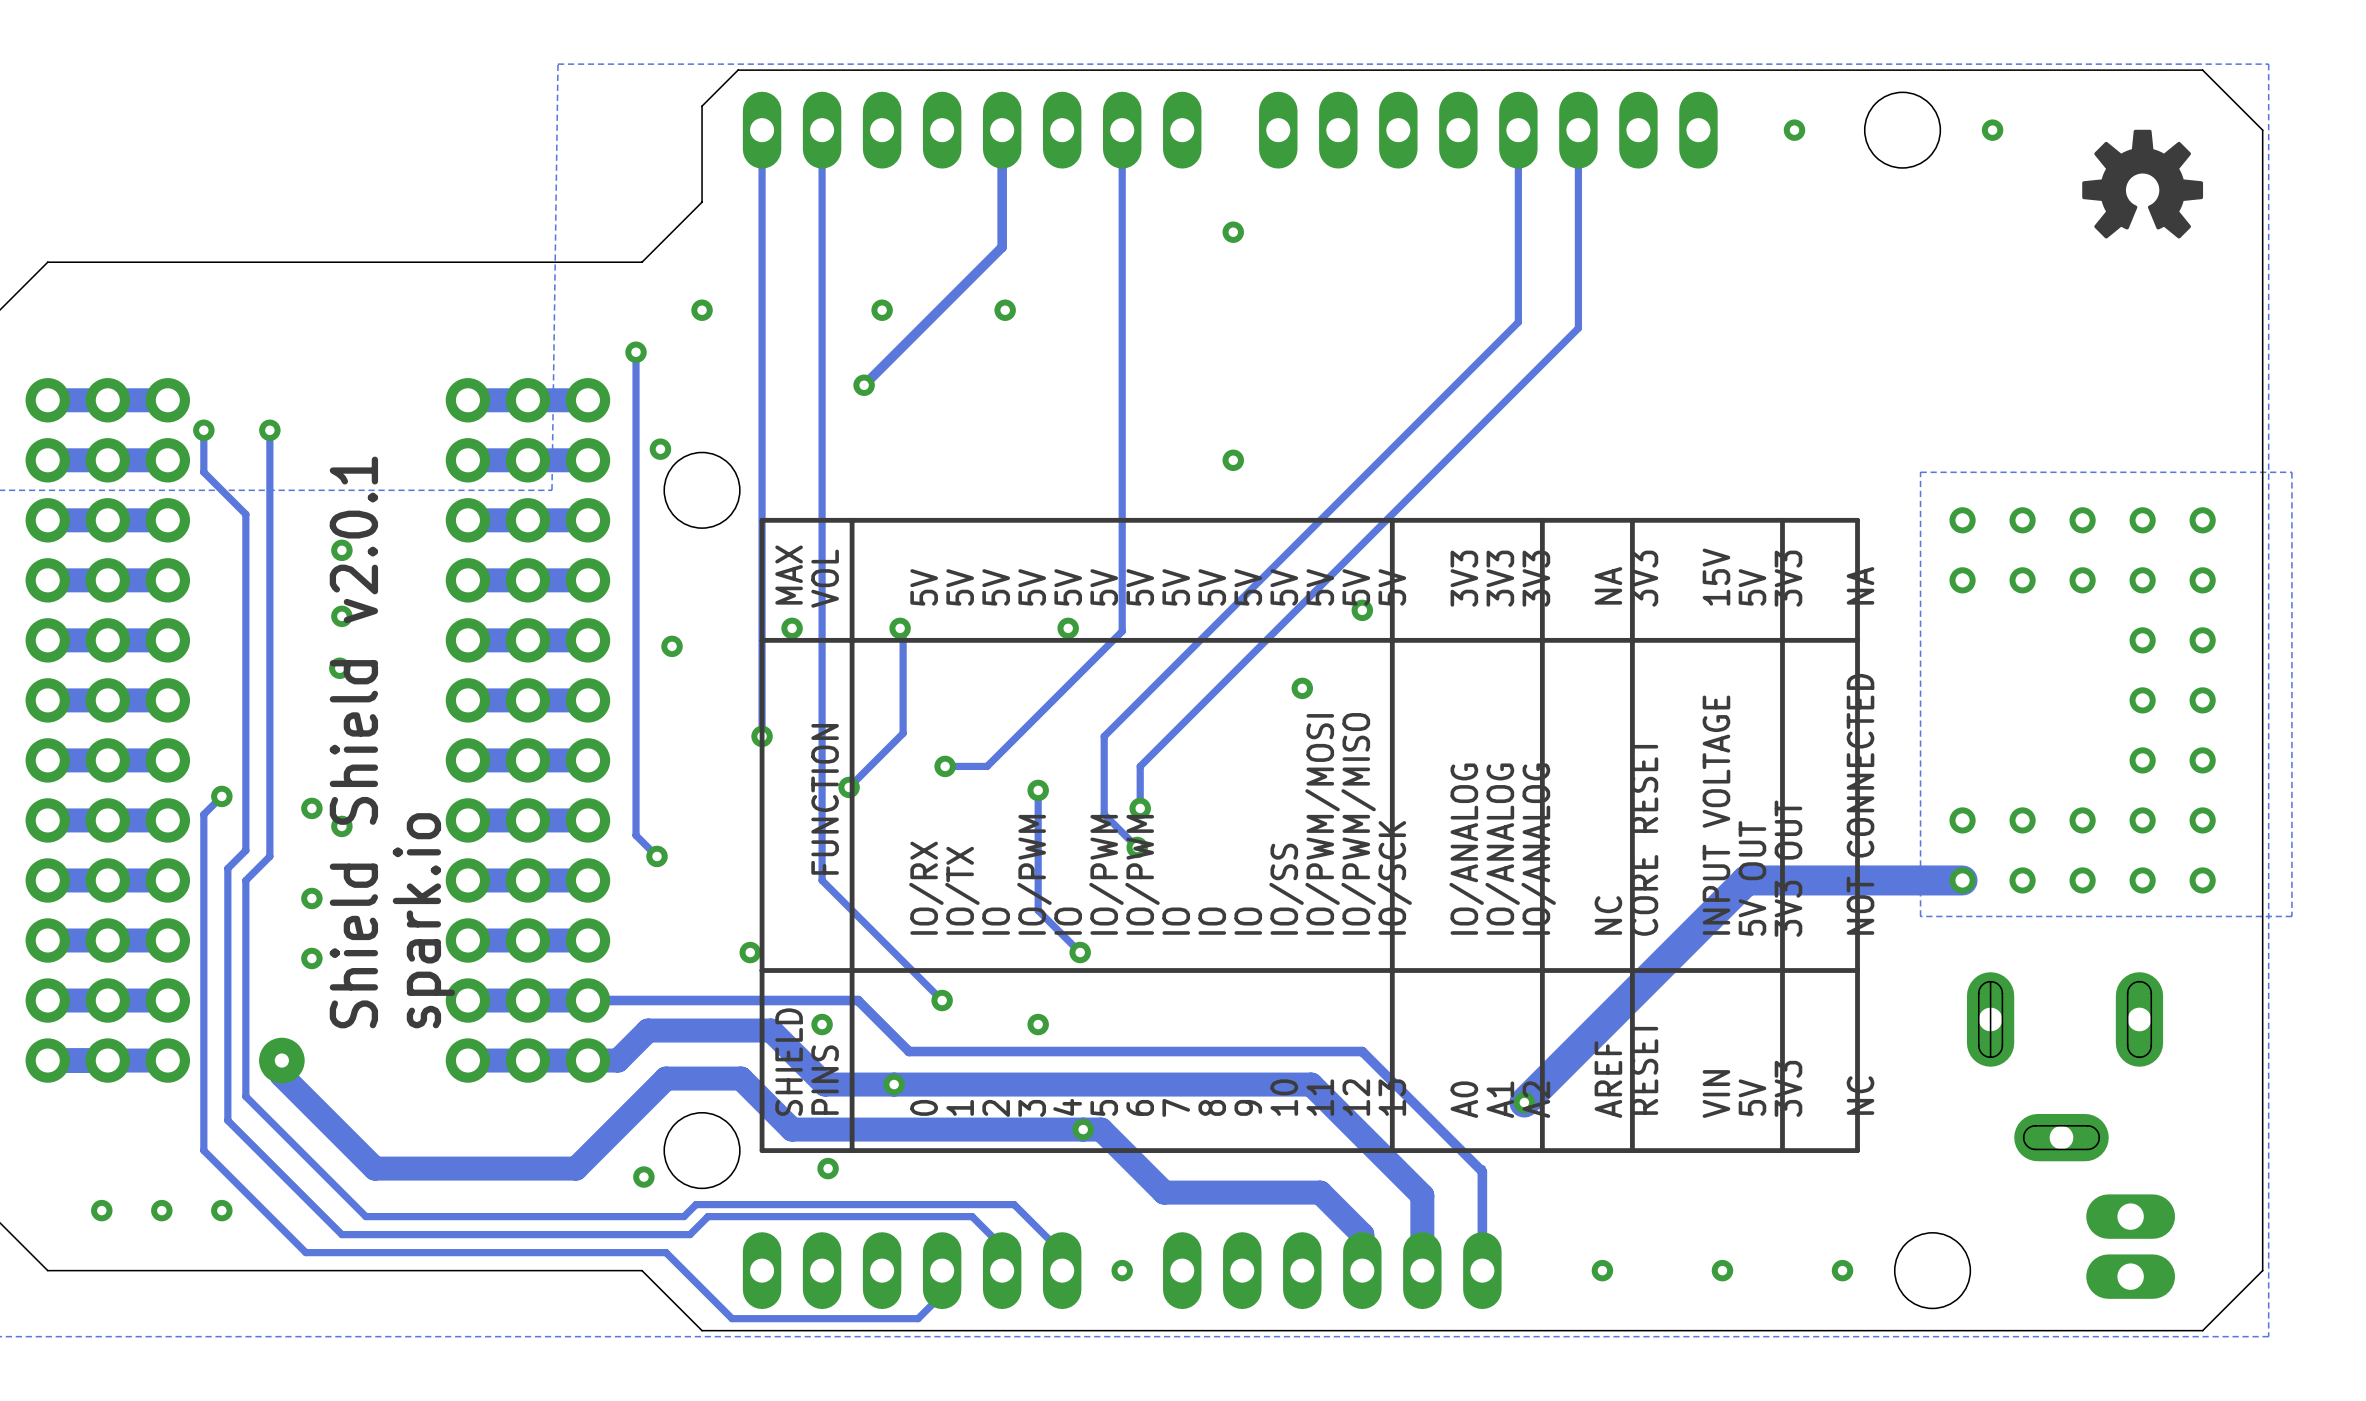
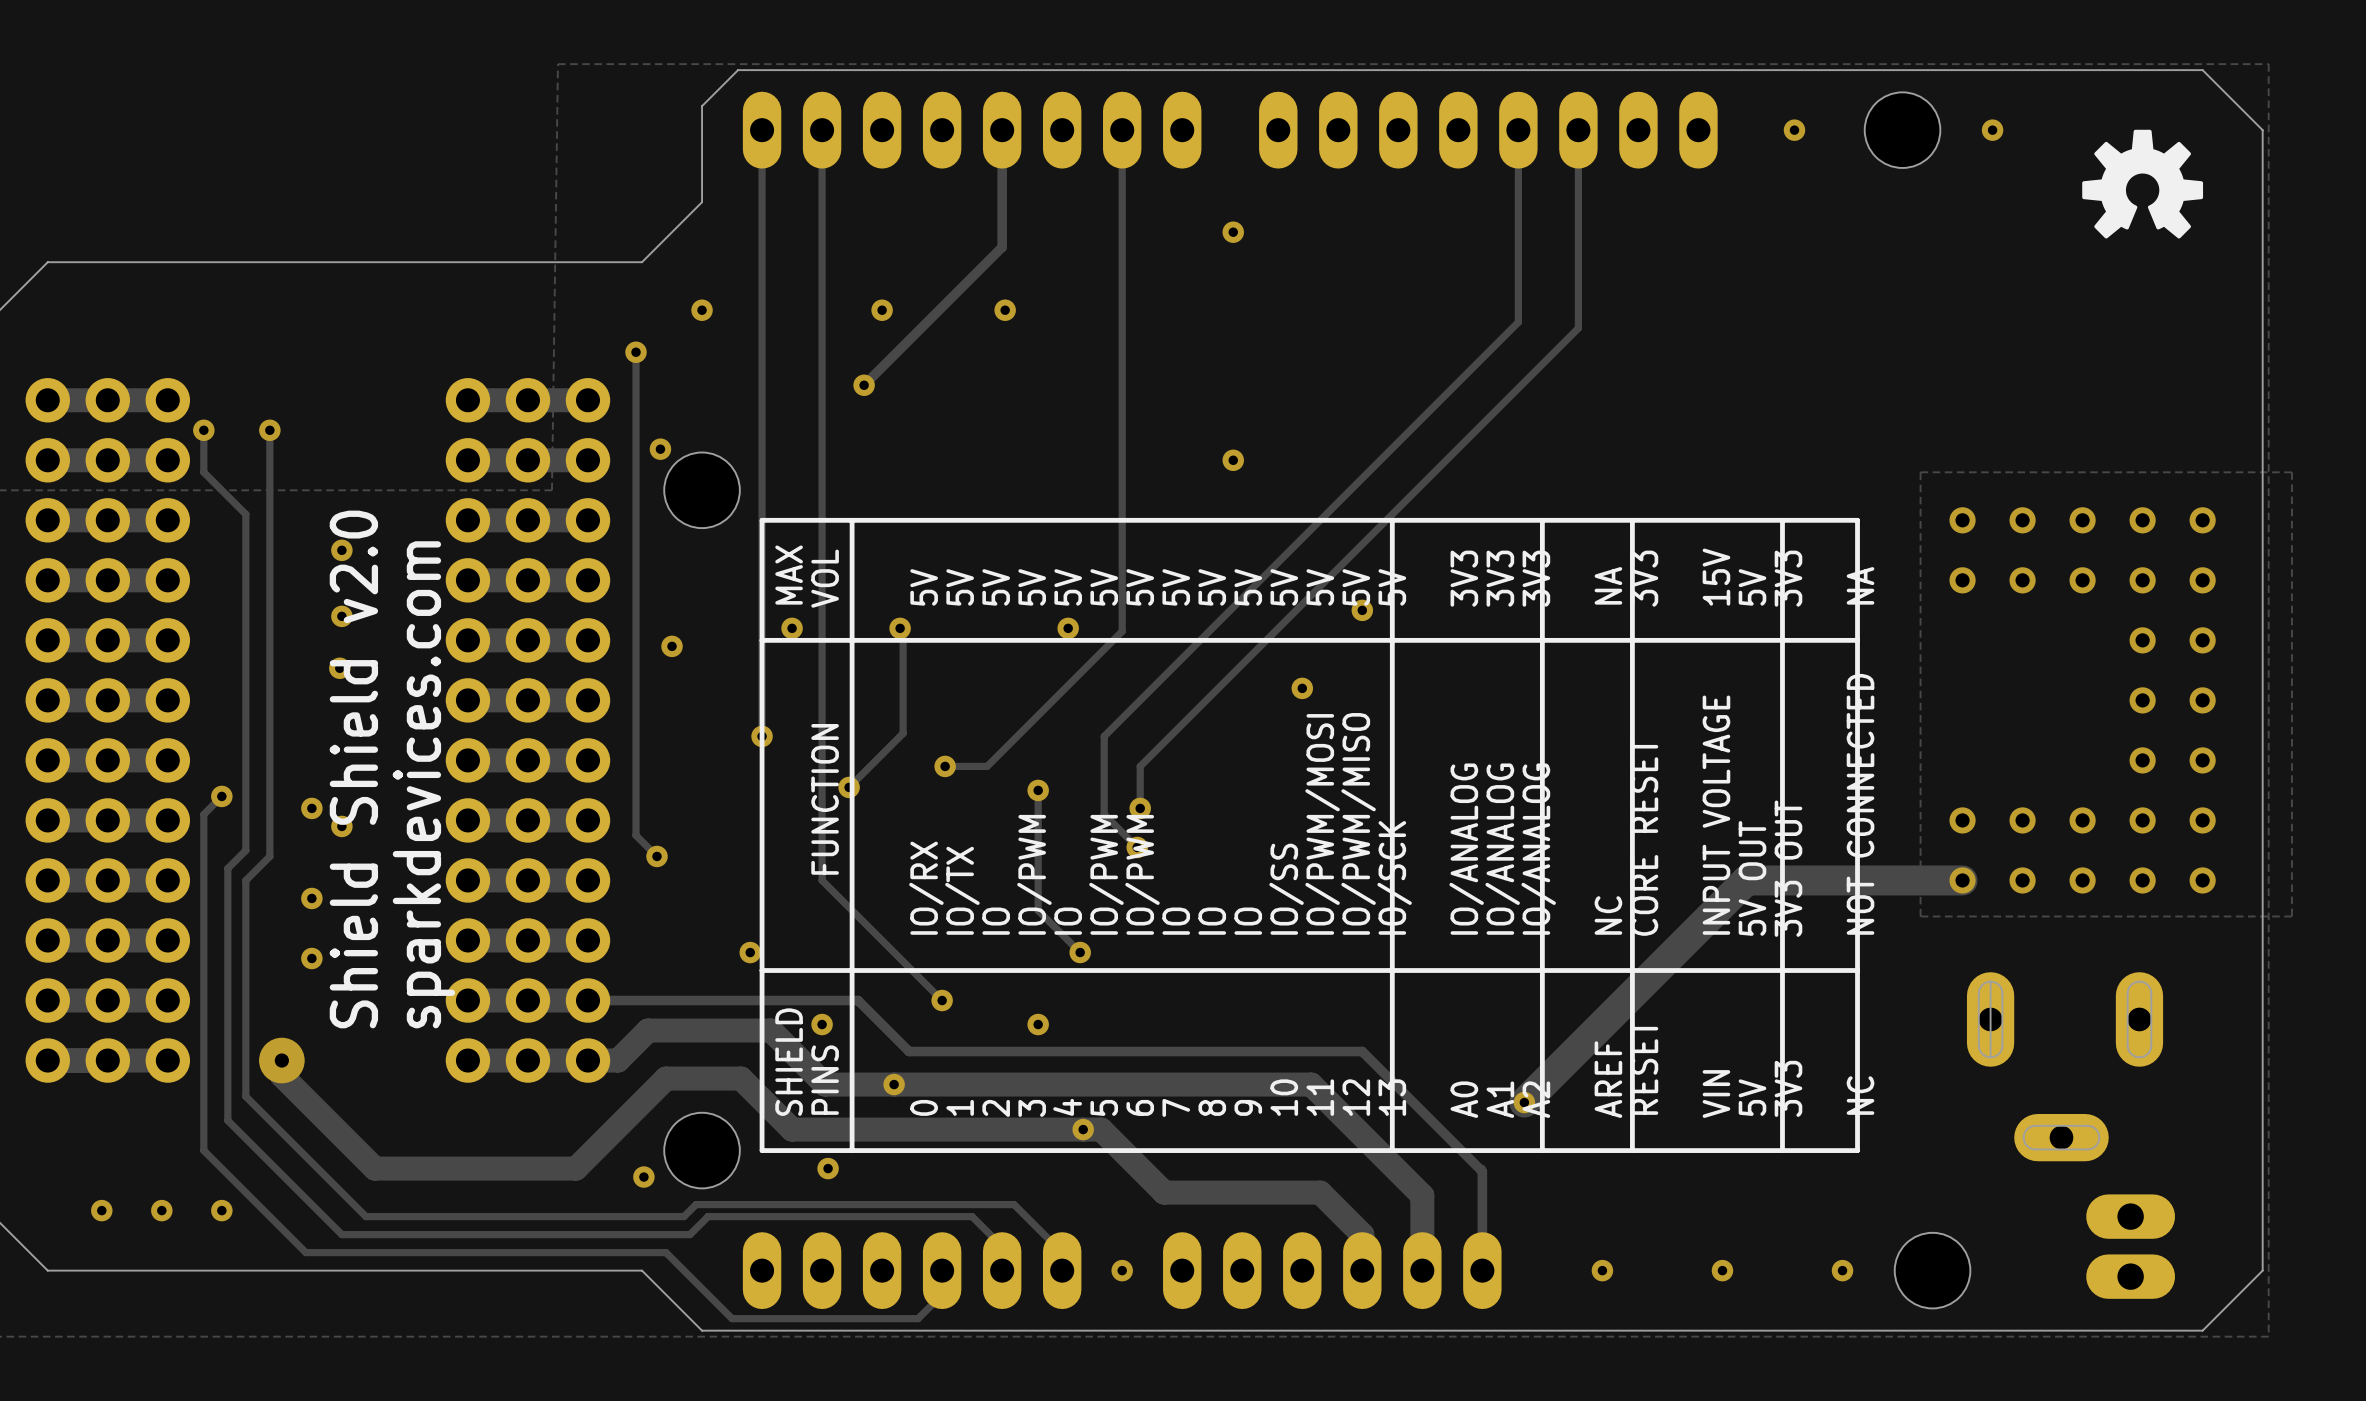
text: Shield Shield v2.0.1 (353, 742) -> Shield Shield v2.0 (353, 769)
text: spark.io (423, 920) -> sparkdevices.com (423, 784)

